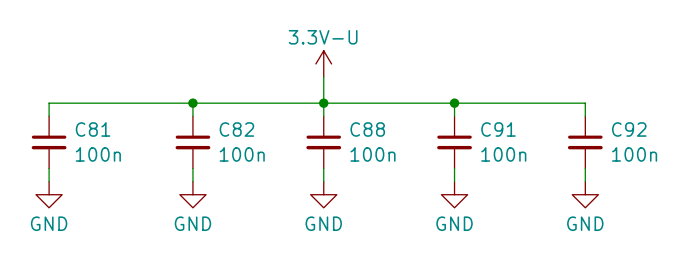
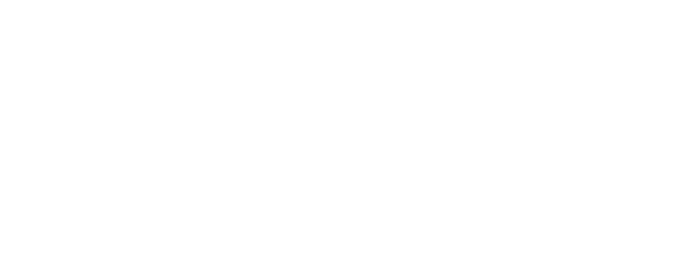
power symbol: 3.3V-U (323, 63) -> none
wire: (323, 77) (323, 116) -> none
wire: (192, 103) (192, 116) -> none
junction: (192, 103) -> none
junction: (323, 103) -> none
wire: (454, 103) (454, 116) -> none
junction: (454, 103) -> none
wire: (49, 116) (49, 103) (585, 103) (585, 116) -> none
C81: 100n (49, 142) -> none
C82: 100n (192, 142) -> none
C88: 100n (323, 142) -> none
C91: 100n (454, 142) -> none
C92: 100n (585, 142) -> none
wire: (49, 168) (49, 181) -> none
wire: (192, 168) (192, 181) -> none
wire: (323, 168) (323, 181) -> none
wire: (454, 168) (454, 181) -> none
wire: (585, 168) (585, 181) -> none
power symbol: GND (49, 194) -> none
power symbol: GND (192, 194) -> none
power symbol: GND (323, 194) -> none
power symbol: GND (454, 194) -> none
power symbol: GND (585, 194) -> none

